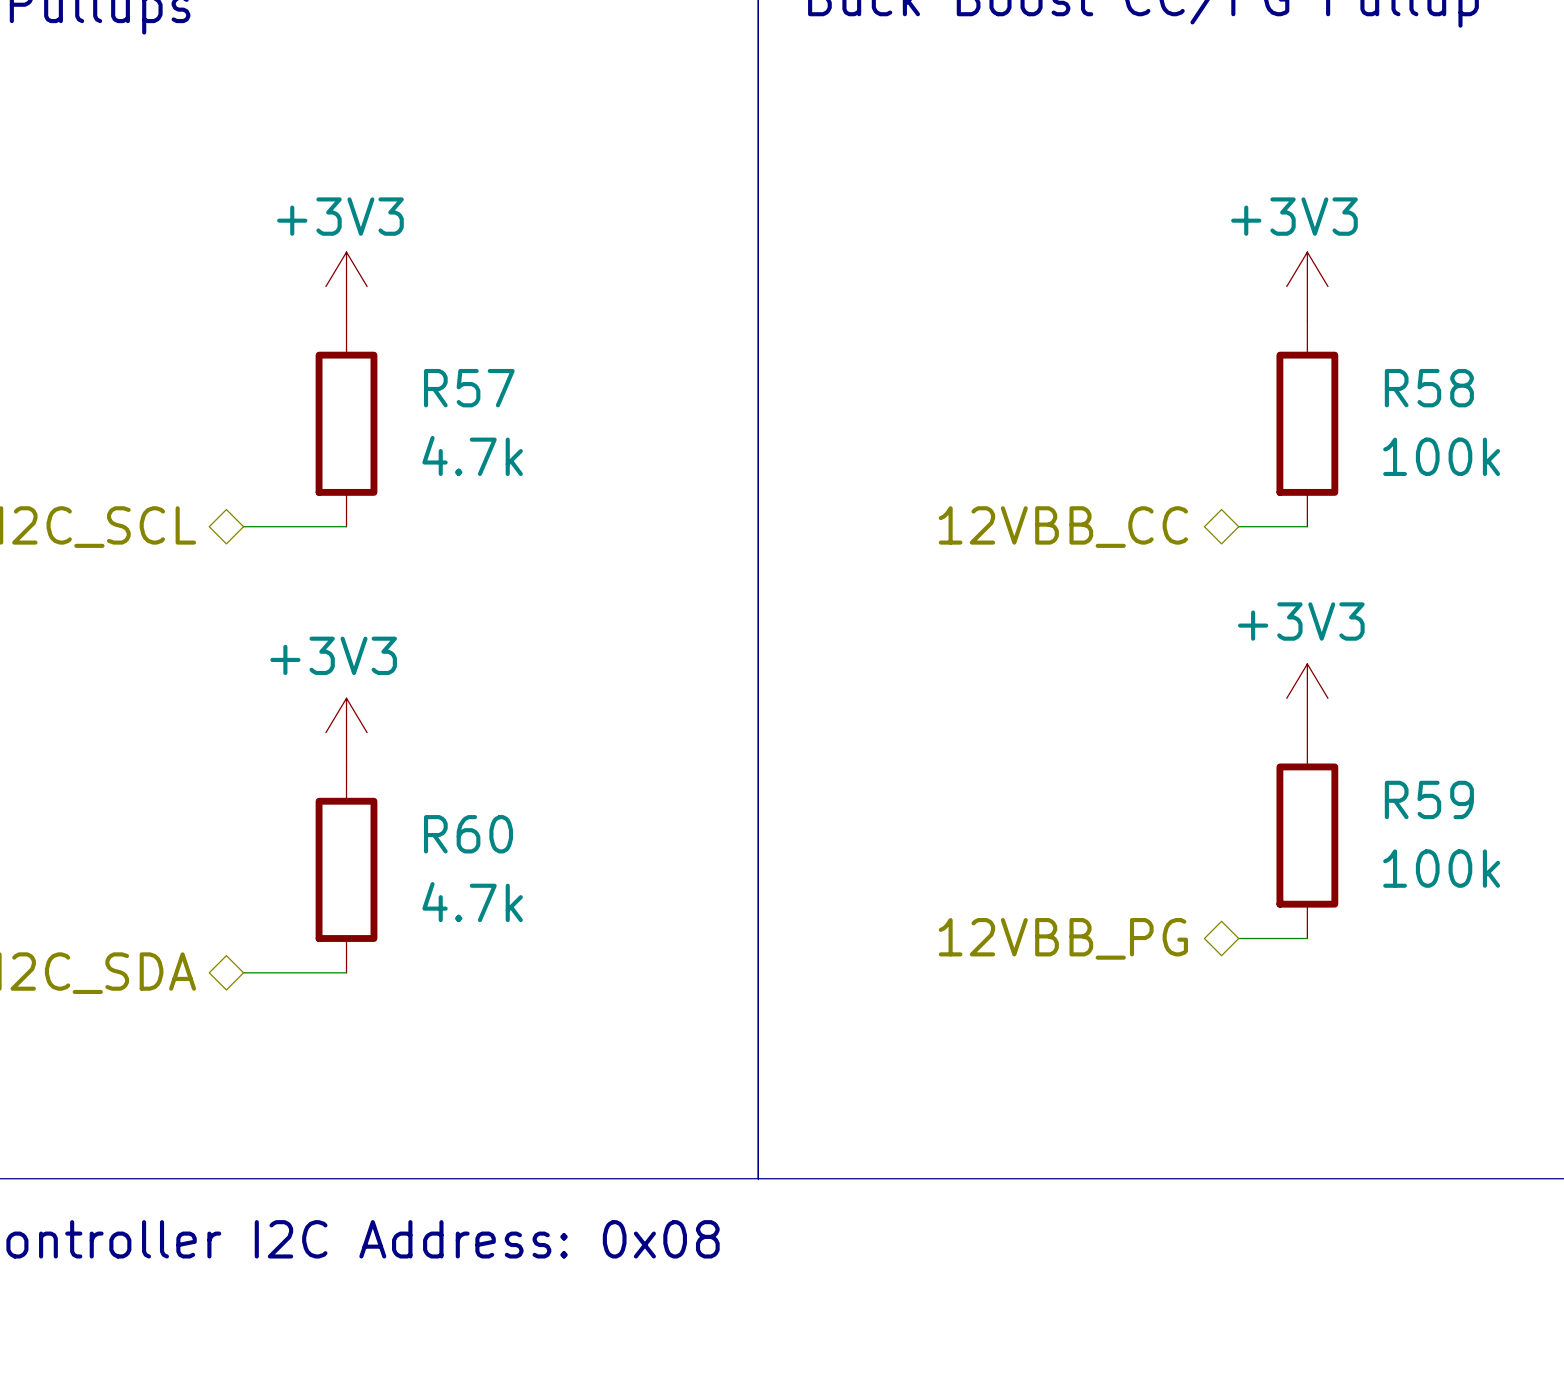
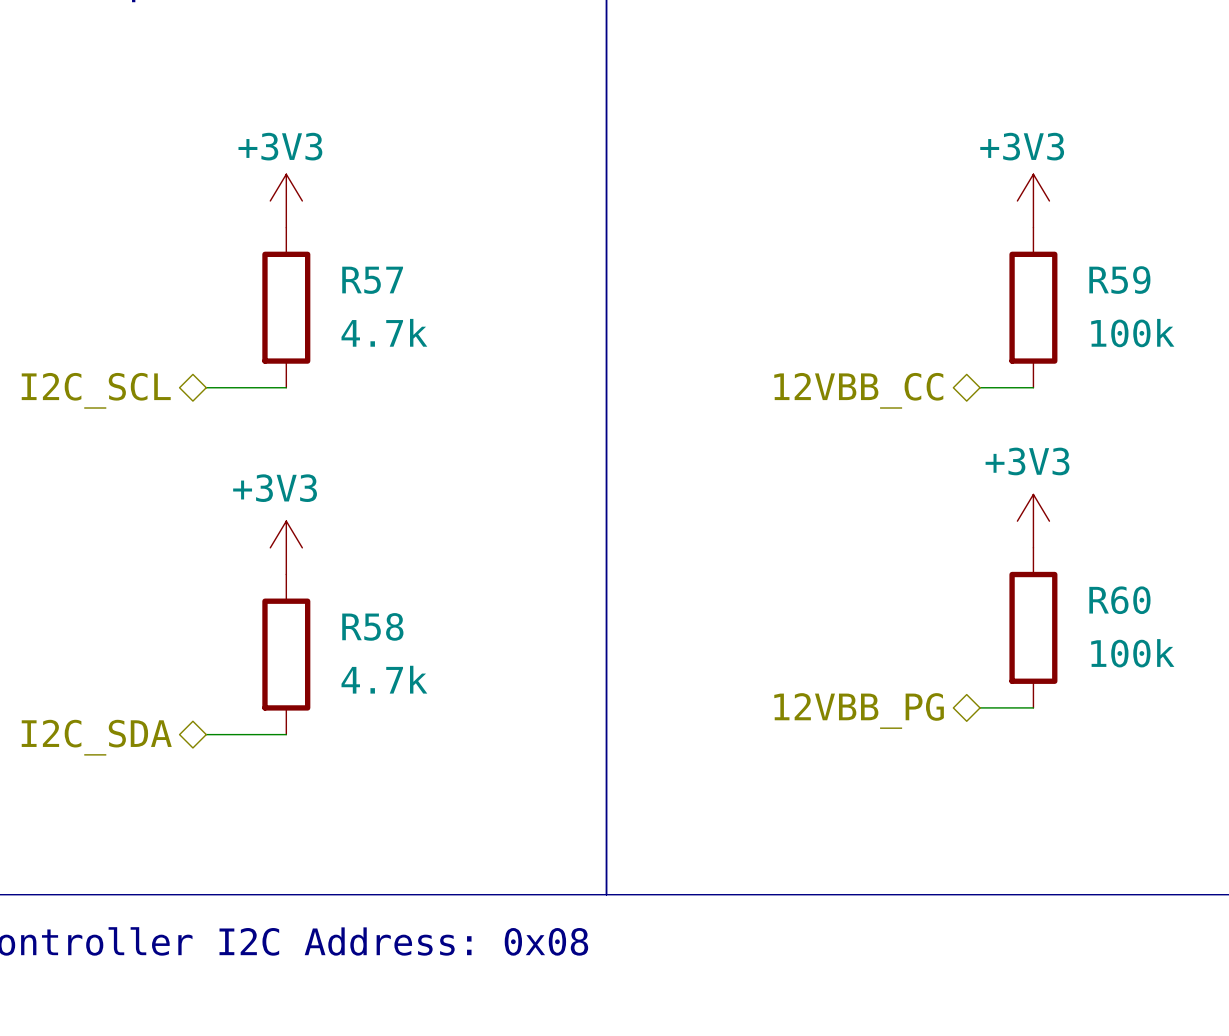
R58 name: R58 (1429, 388) -> R59 (1119, 280)
R59 name: R59 (1429, 799) -> R60 (1119, 600)
R60 name: R60 (468, 834) -> R58 (372, 626)

